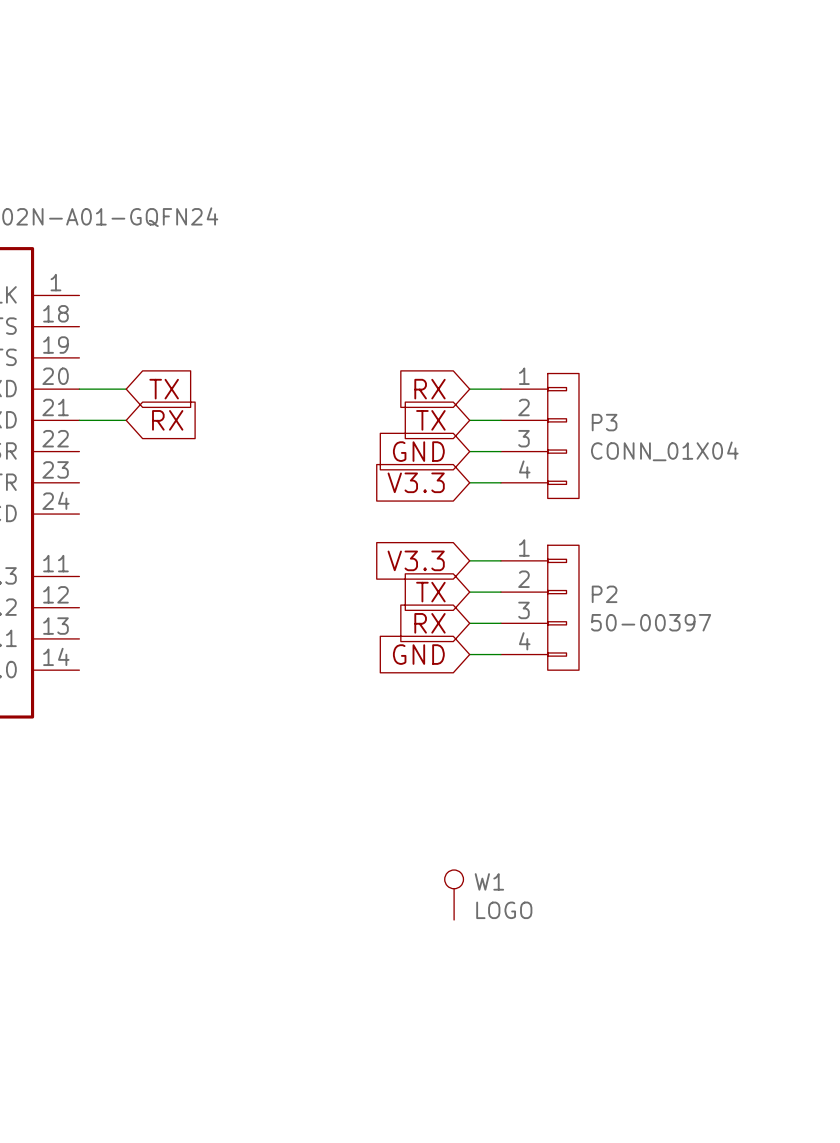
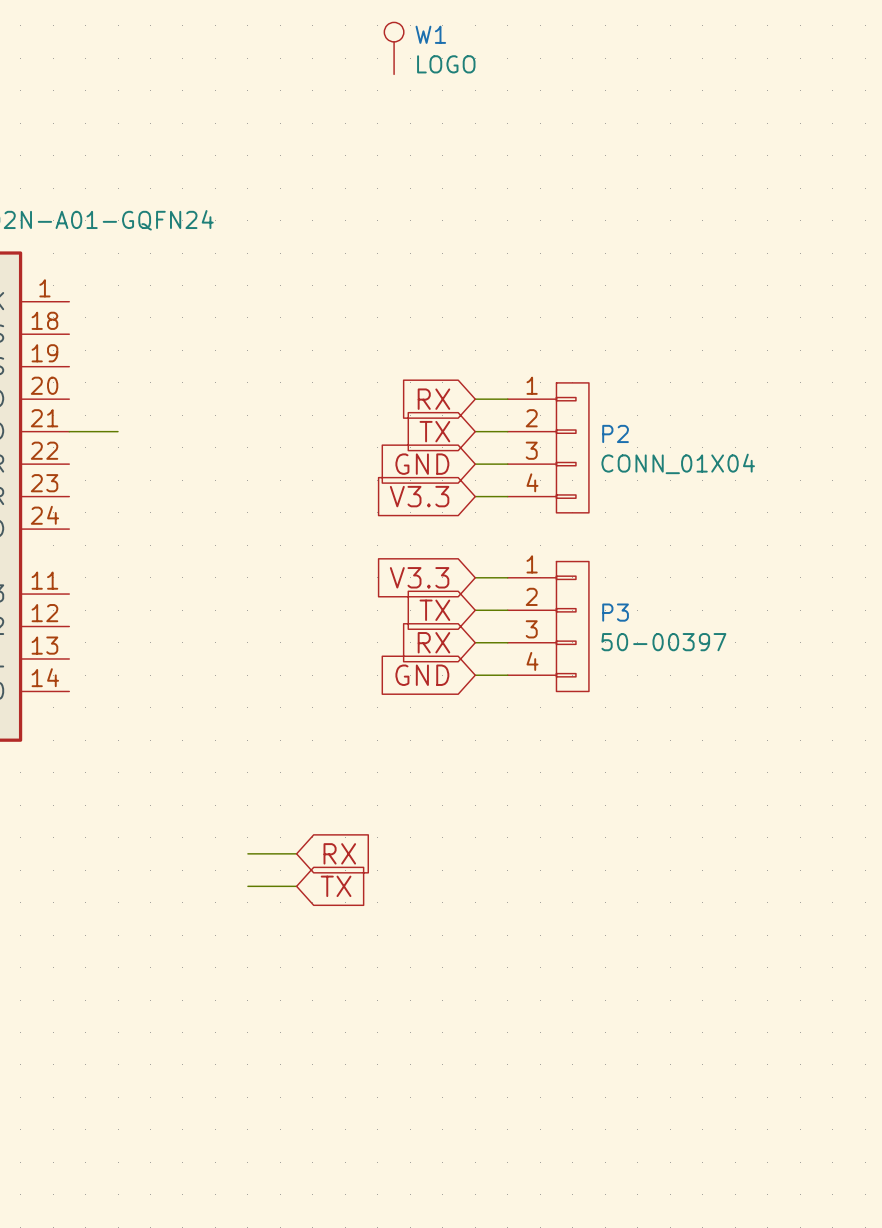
wire: (79, 389) (126, 389) -> none
global label: TX (164, 389) -> none
global label: RX (167, 420) -> none
P3 name: P3 (604, 422) -> P2 (615, 433)
P2 name: P2 (604, 594) -> P3 (615, 612)
wire: none -> (247, 853) (296, 853)
global label: none -> RX (339, 853)
wire: none -> (247, 886) (296, 886)
global label: none -> TX (336, 886)
W1 position: (454, 894) -> (394, 48)

